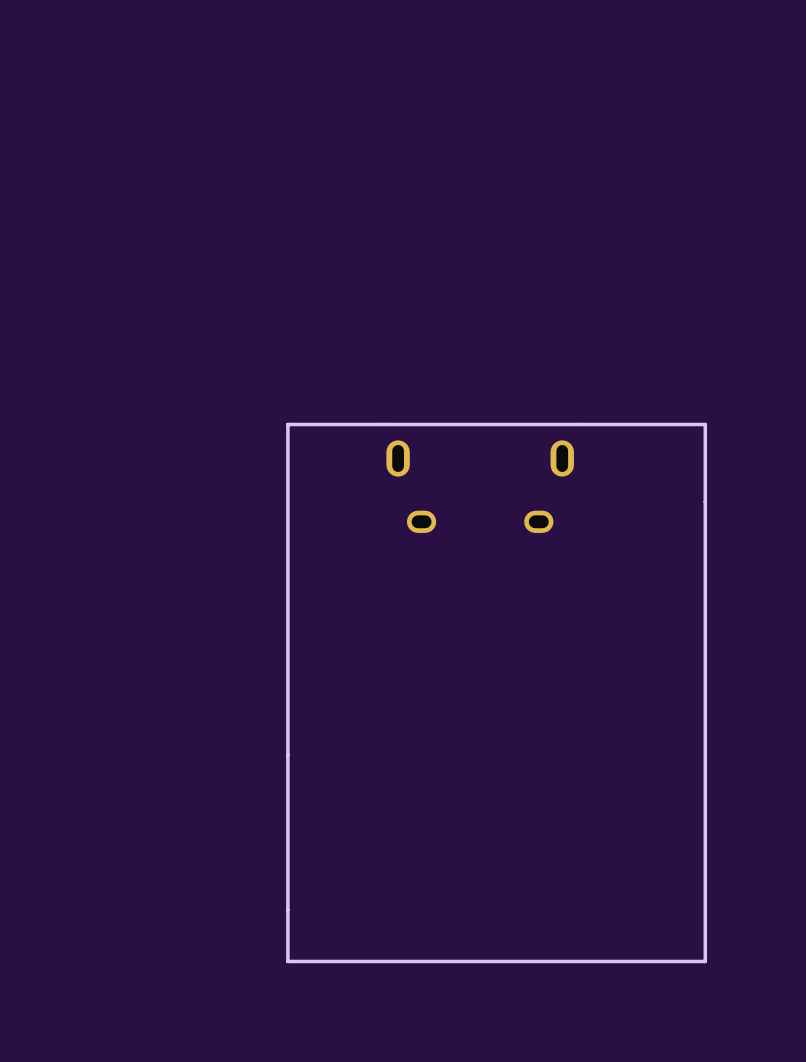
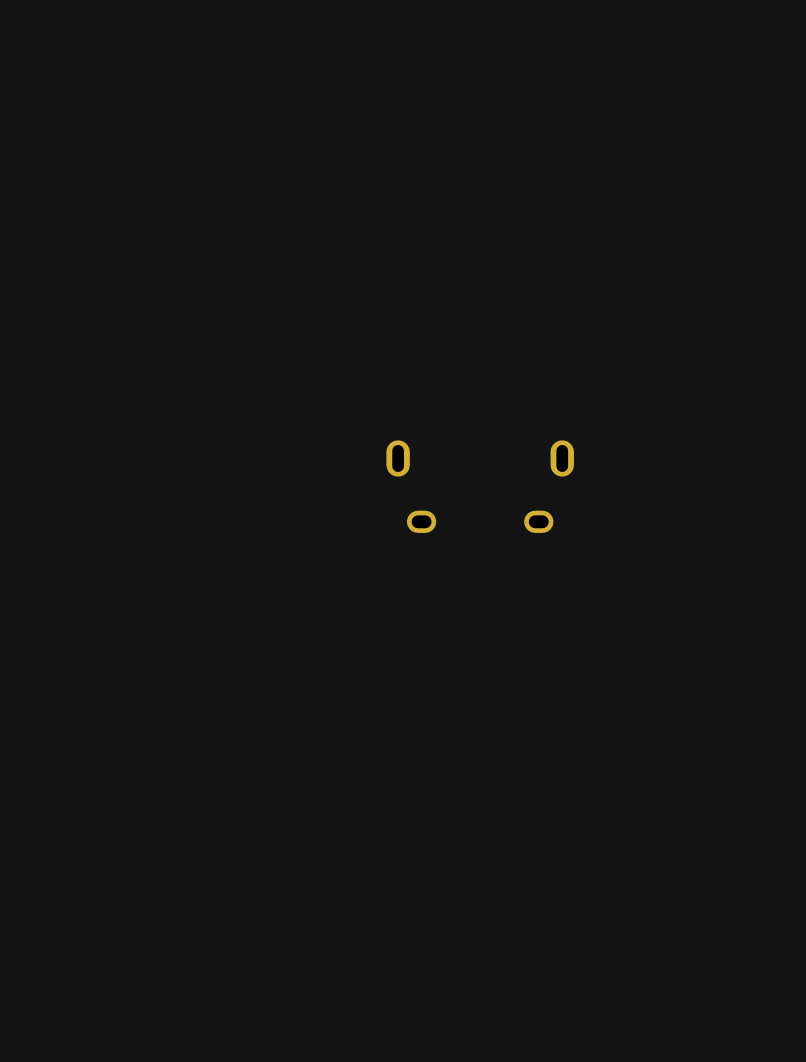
board edge: (705, 424) (287, 424) (287, 961) (705, 961) (705, 424) -> none

